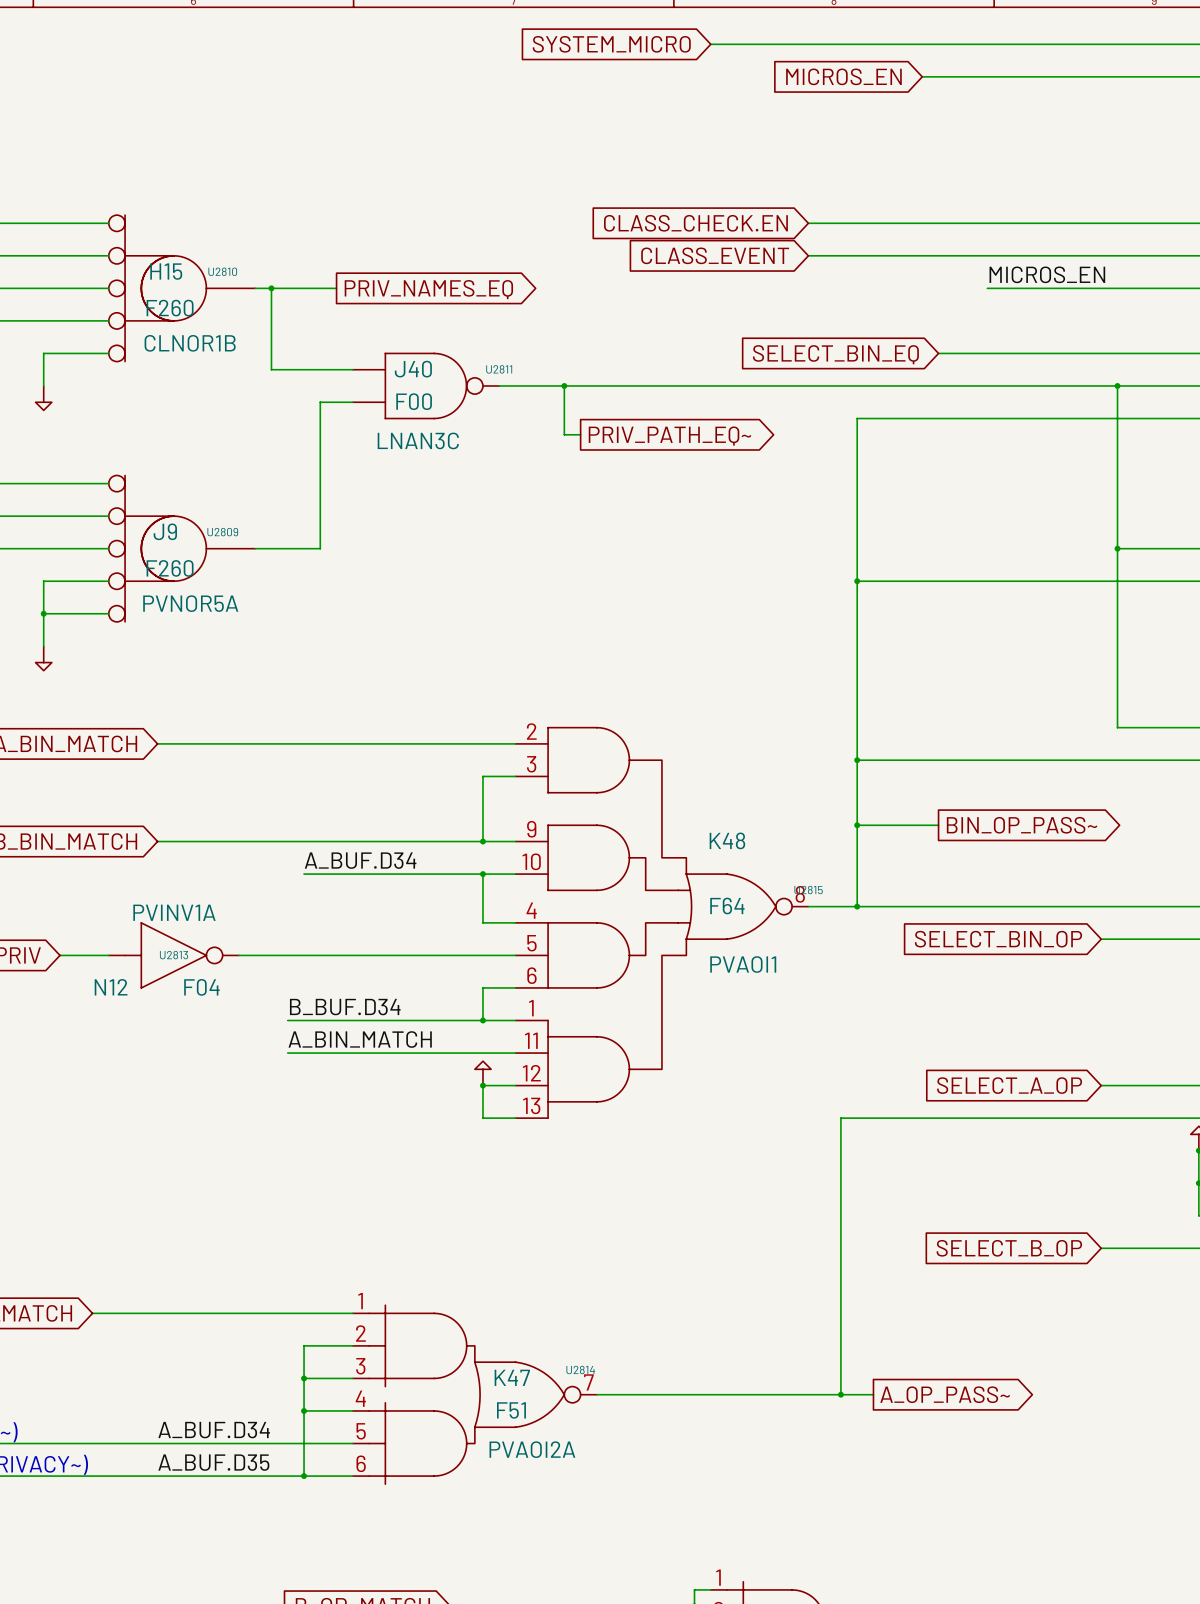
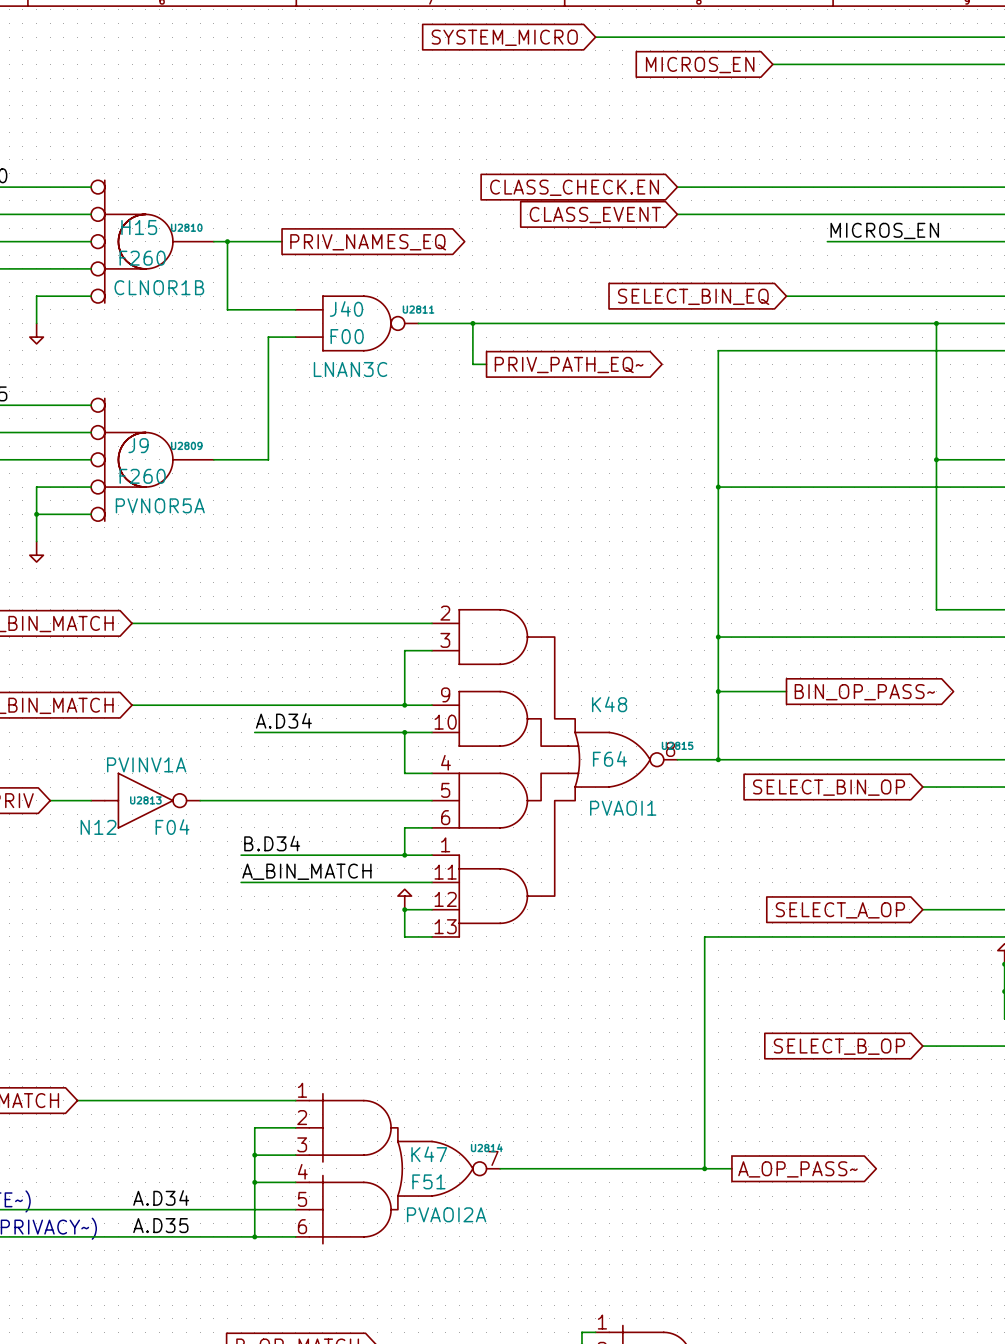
label: A_BUF.D34 (360, 860) -> A.D34 (283, 720)
label: B_BUF.D34 (345, 1007) -> B.D34 (272, 843)
label: A_BUF.D34 (214, 1430) -> A.D34 (161, 1197)
label: A_BUF.D35 (213, 1462) -> A.D35 (160, 1225)

